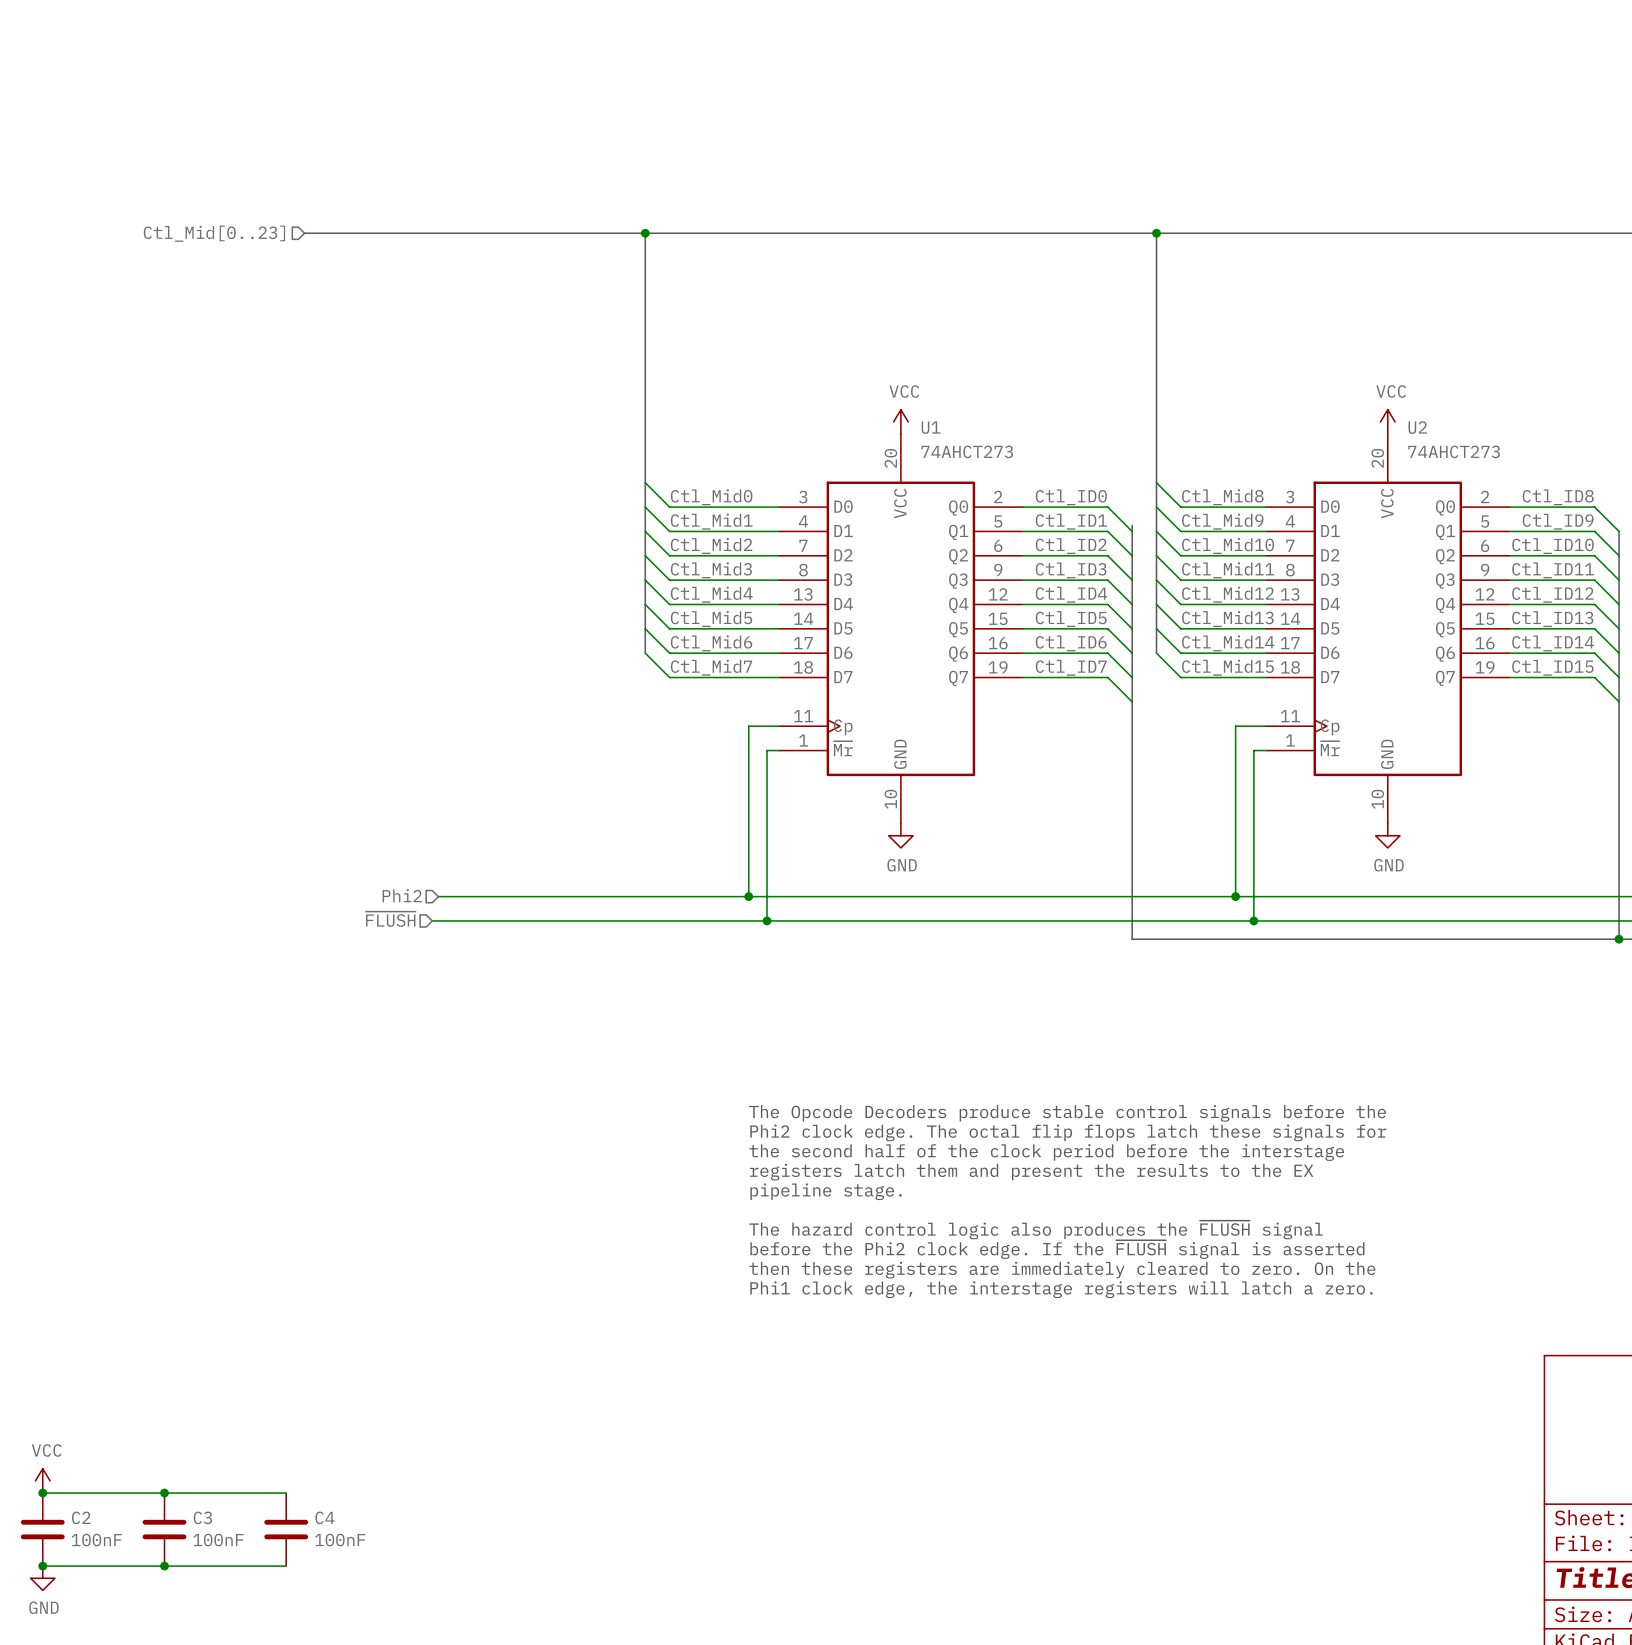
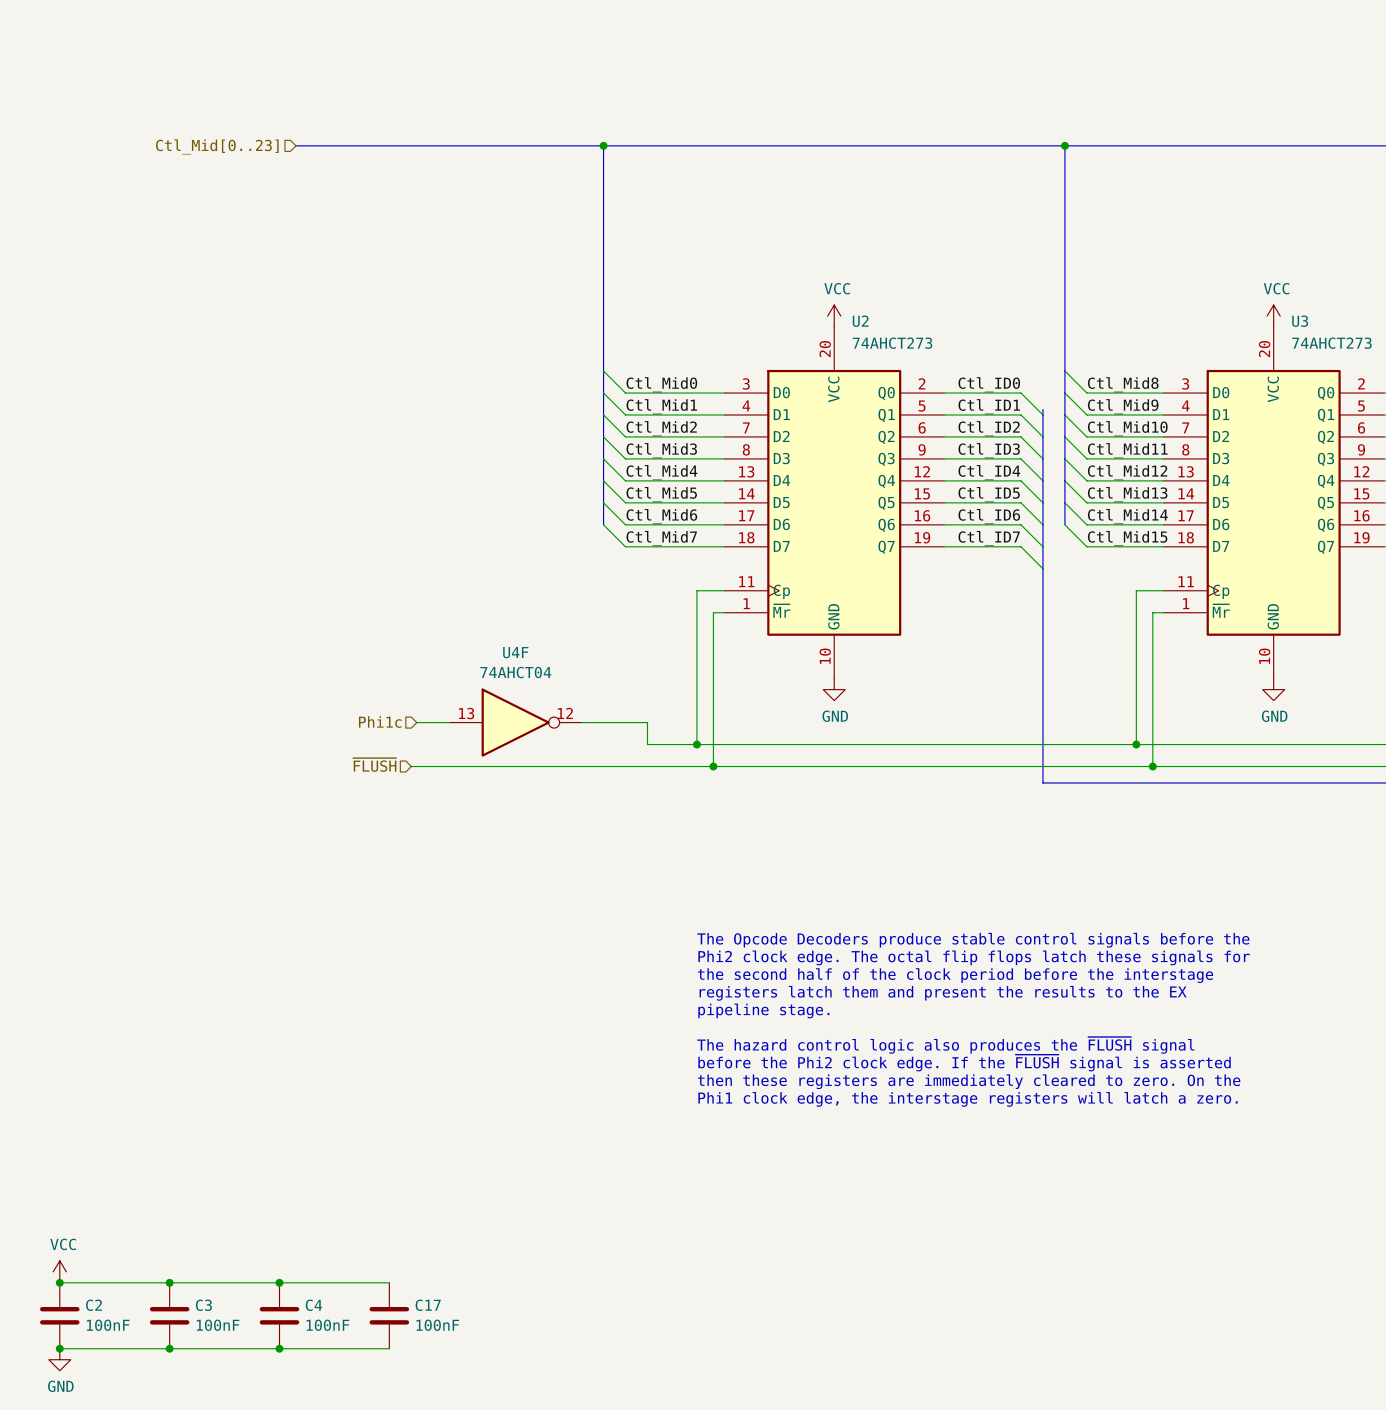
U1 name: U1 (931, 427) -> U2 (860, 321)
U2 name: U2 (1417, 427) -> U3 (1300, 321)
wire: none -> (416, 722) (449, 722)
U4F: none -> 74AHCT04 (515, 722)
hierarchical label: Phi2 (402, 895) -> Phi1c (380, 722)
wire: (438, 896) (693, 896) -> (581, 722) (647, 722) (647, 744)
wire: none -> (279, 1282) (389, 1282)
junction: none -> (279, 1282)
C17: none -> 100nF (389, 1315)
wire: none -> (279, 1348) (389, 1348)
junction: none -> (279, 1348)

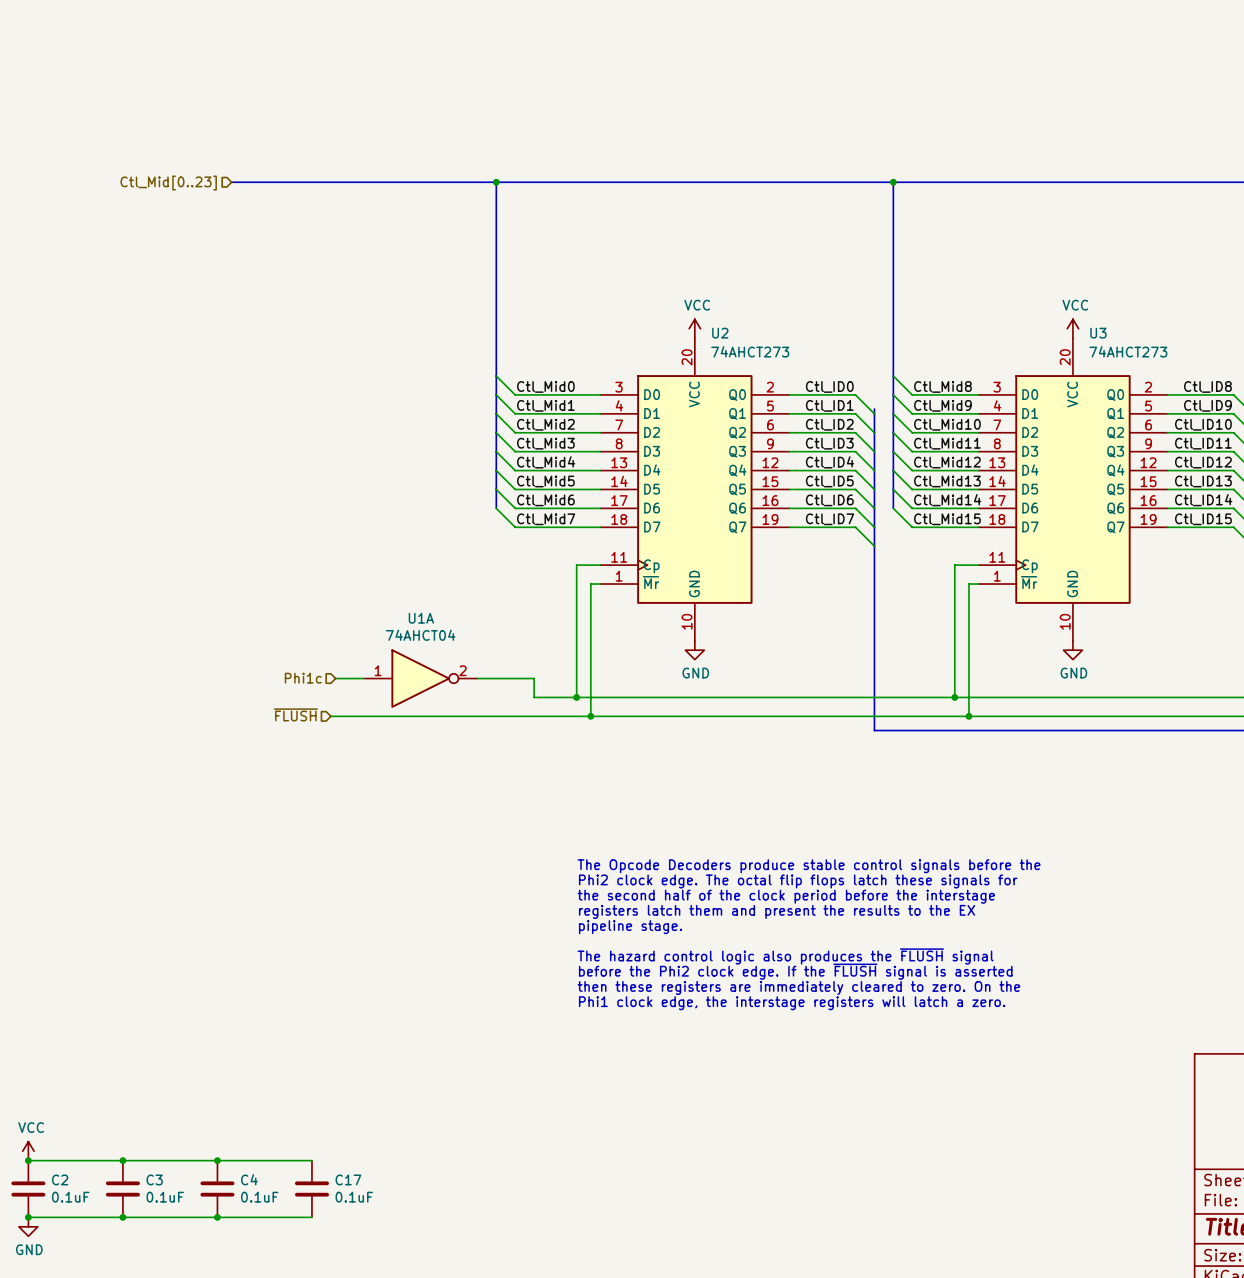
U4F name: U4F (515, 652) -> U1A (421, 618)
U4F pin number: 13 (466, 713) -> 1 (378, 670)
U4F pin number: 12 (565, 713) -> 2 (463, 670)
C2 value: 100nF (108, 1325) -> 0.1uF (70, 1197)
C3 value: 100nF (218, 1325) -> 0.1uF (165, 1197)
C4 value: 100nF (327, 1325) -> 0.1uF (259, 1197)
C17 value: 100nF (437, 1325) -> 0.1uF (354, 1197)

